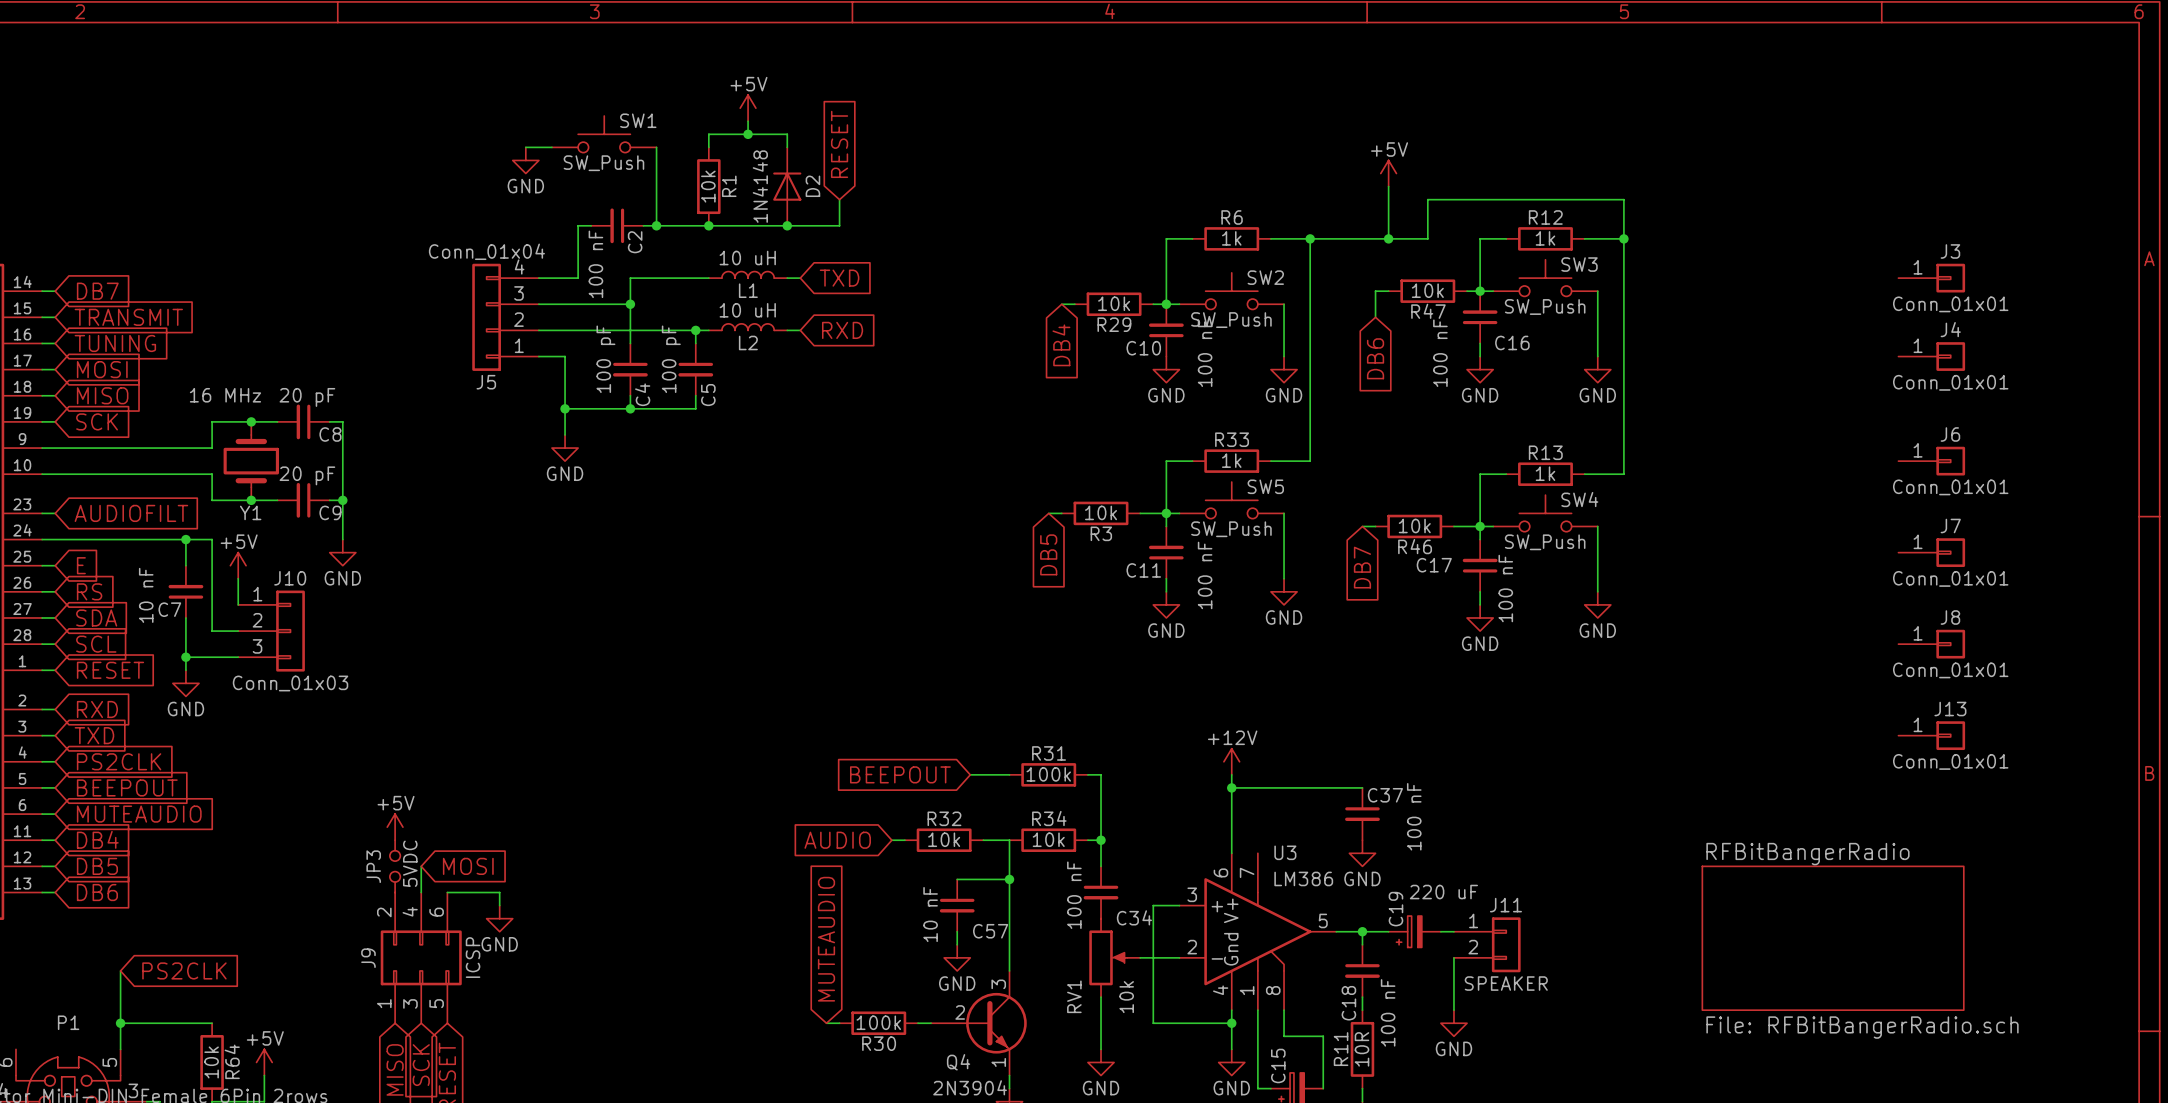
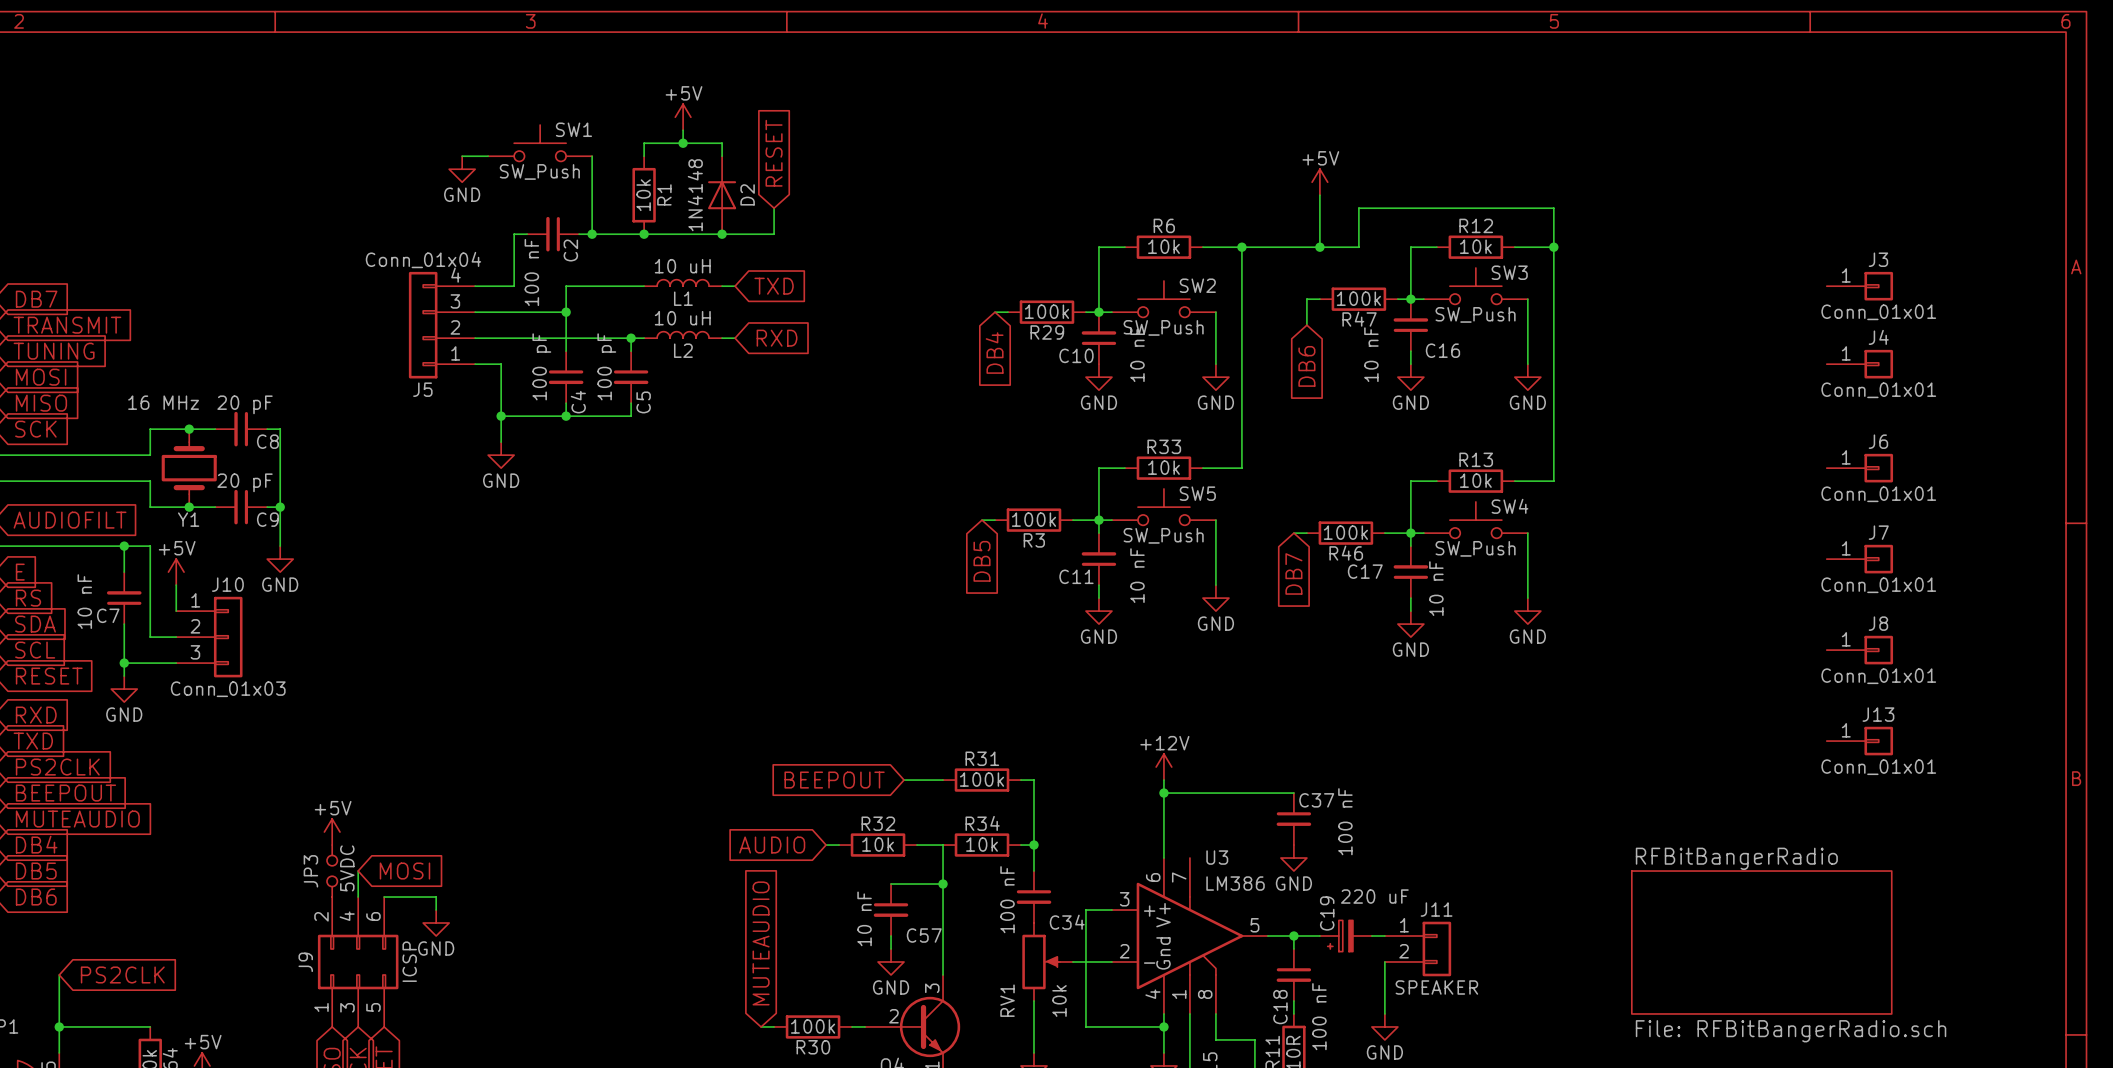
R6 value: 1k (1231, 238) -> 10k (1163, 246)
R12 value: 1k (1545, 238) -> 10k (1475, 246)
R47 value: 10k (1427, 290) -> 100k (1358, 298)
R29 value: 10k (1114, 303) -> 100k (1046, 311)
C10 value: 100 nF (1205, 353) -> 10 nF (1137, 354)
C16 value: 100 nF (1440, 353) -> 10 nF (1371, 354)
R33 value: 1k (1231, 460) -> 10k (1163, 467)
R13 value: 1k (1545, 473) -> 10k (1475, 480)
R3 value: 10k (1101, 512) -> 100k (1033, 519)
R46 value: 10k (1414, 526) -> 100k (1345, 532)
C11 value: 100 nF (1205, 575) -> 10 nF (1137, 575)
C17 value: 100 nF (1505, 588) -> 10 nF (1436, 588)

